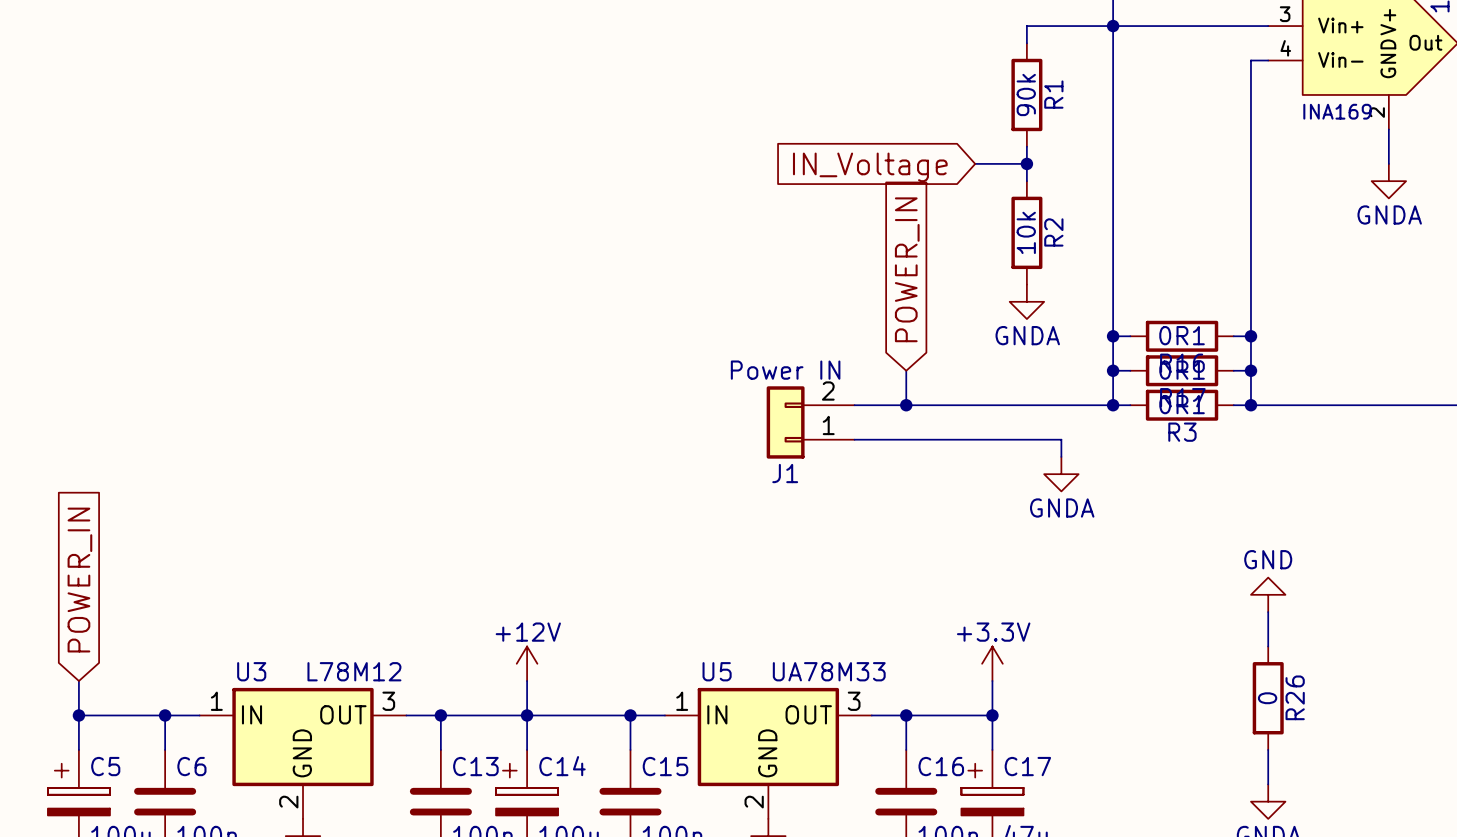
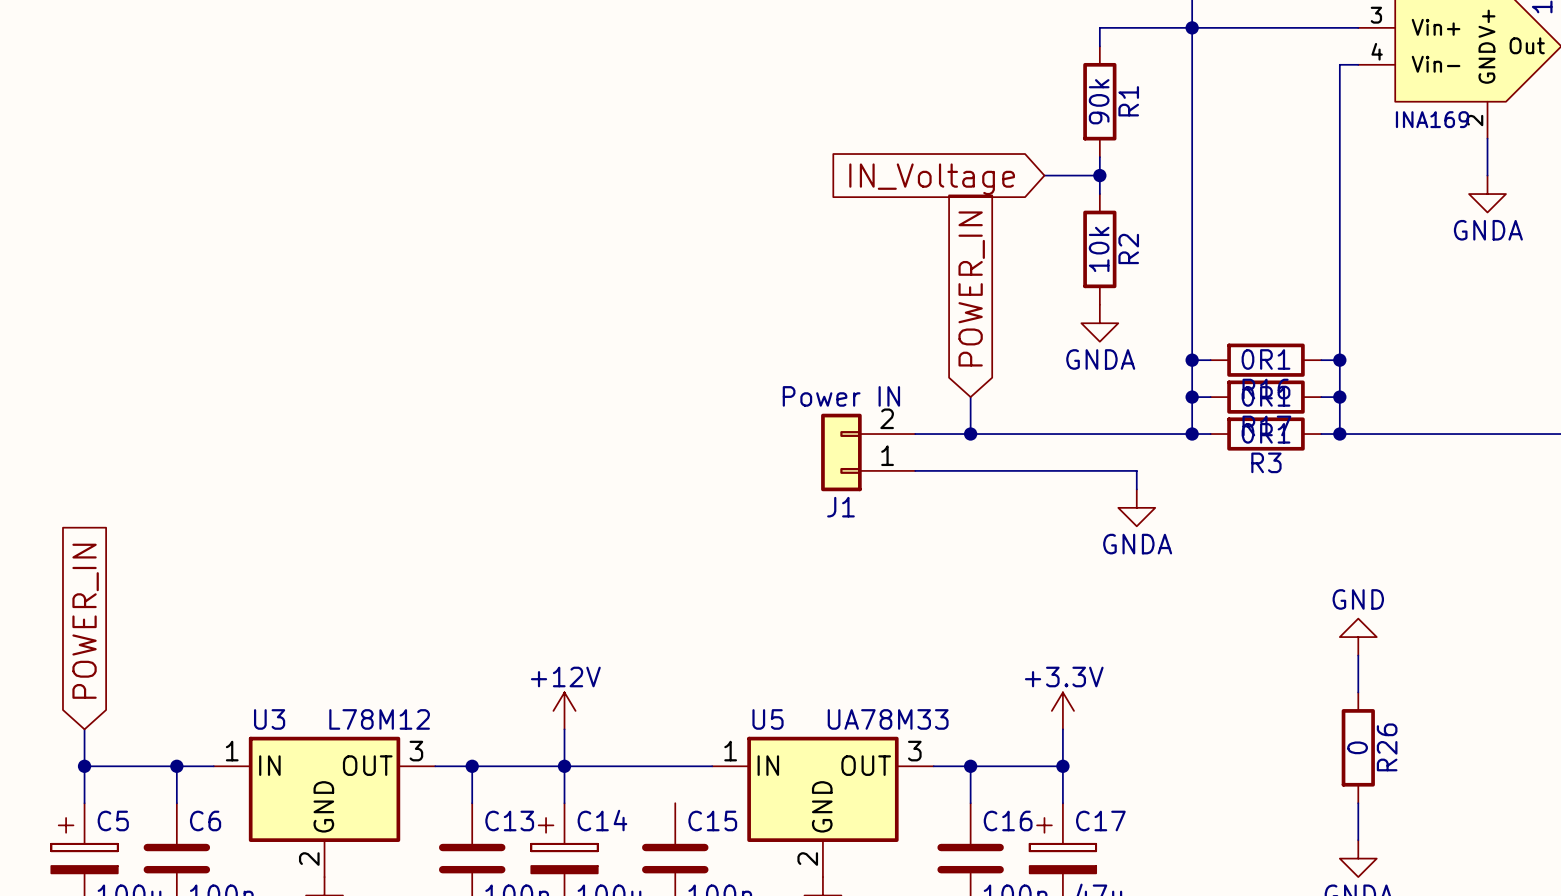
wire: (630, 715) (630, 749) -> none
junction: (630, 715) -> none

